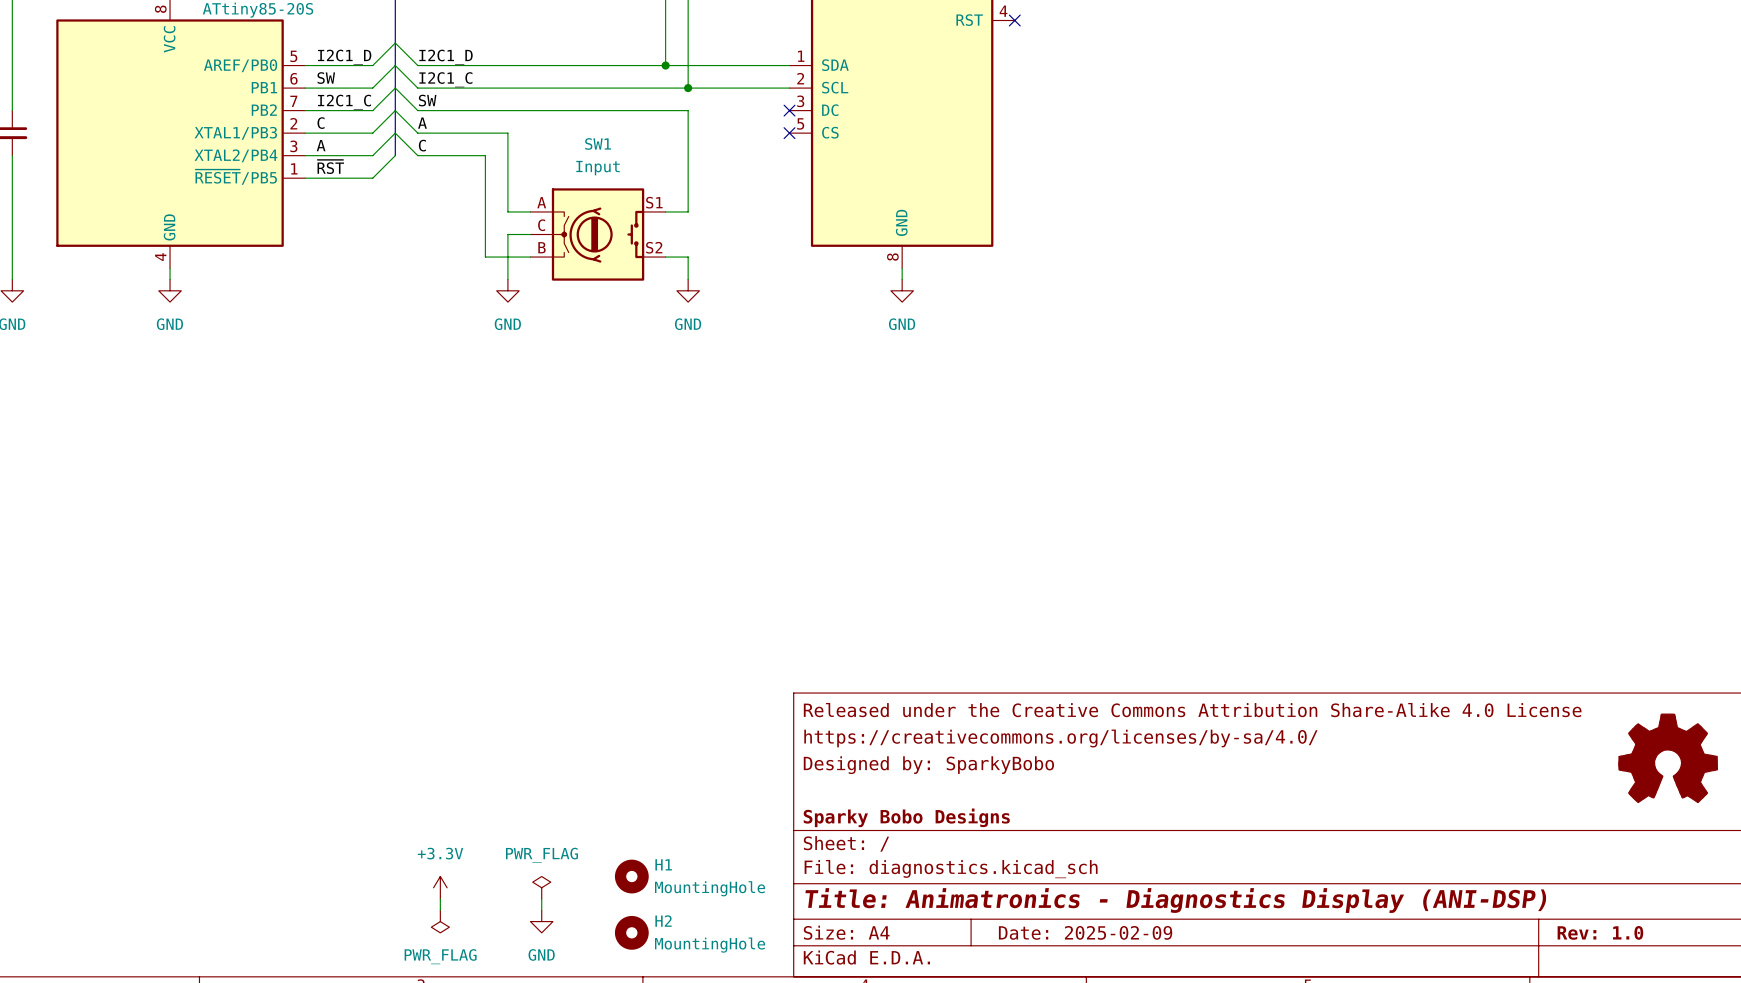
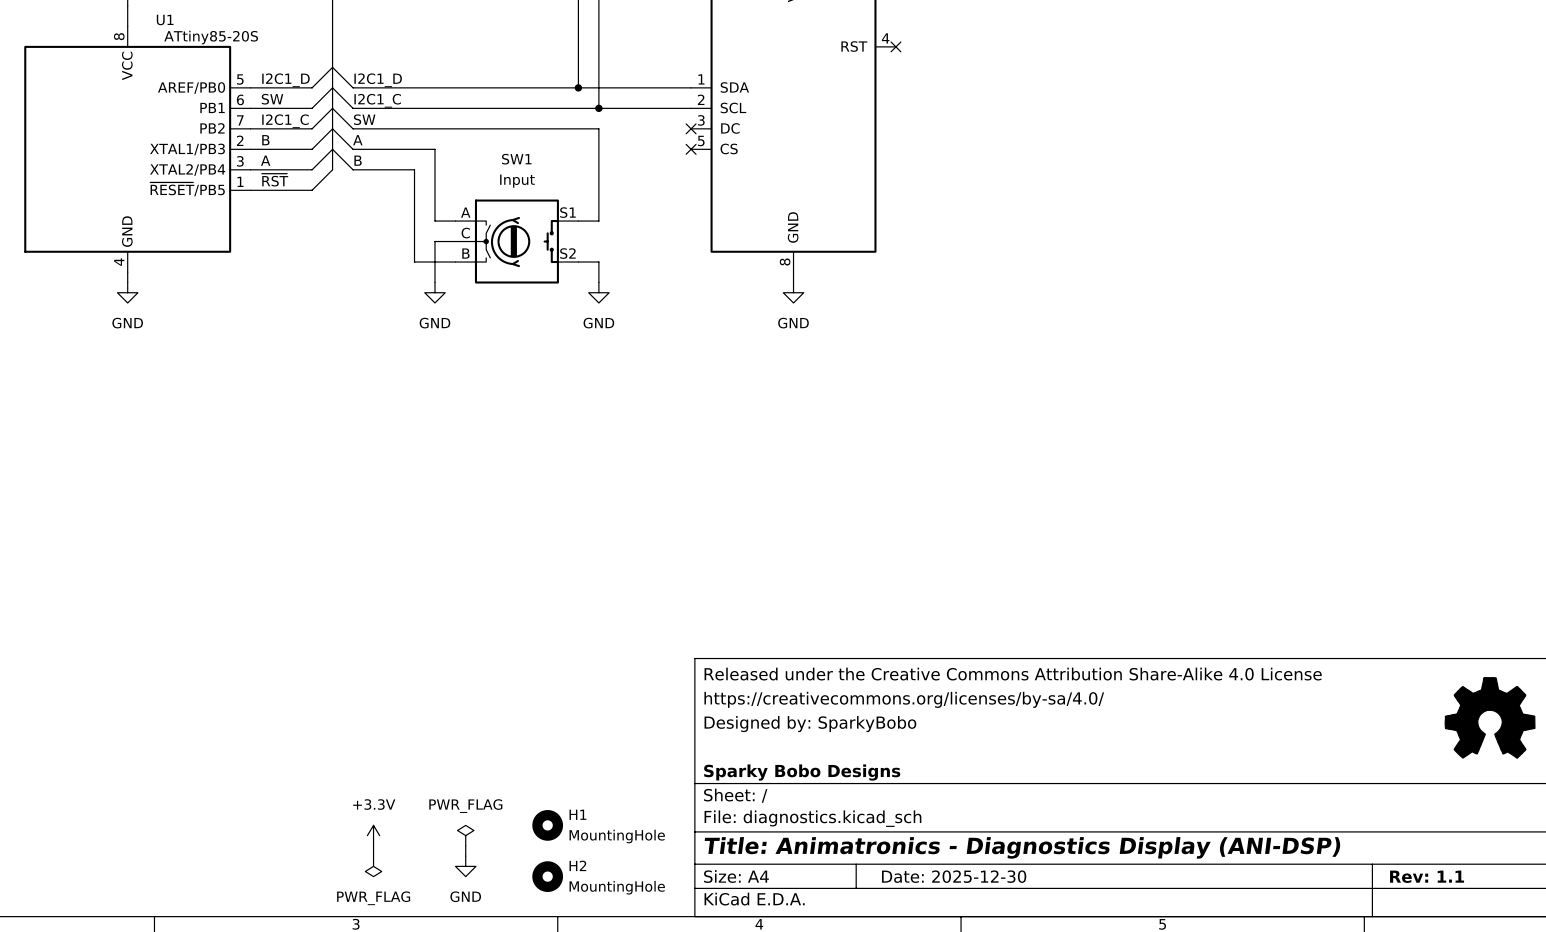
label: C (321, 123) -> B (265, 140)
label: C (422, 145) -> B (358, 160)
title block: Date: 2025-02-09 (1085, 932) -> Date: 2025-12-30 (954, 876)
title block: Rev: 1.0 (1600, 932) -> Rev: 1.1 (1427, 876)

